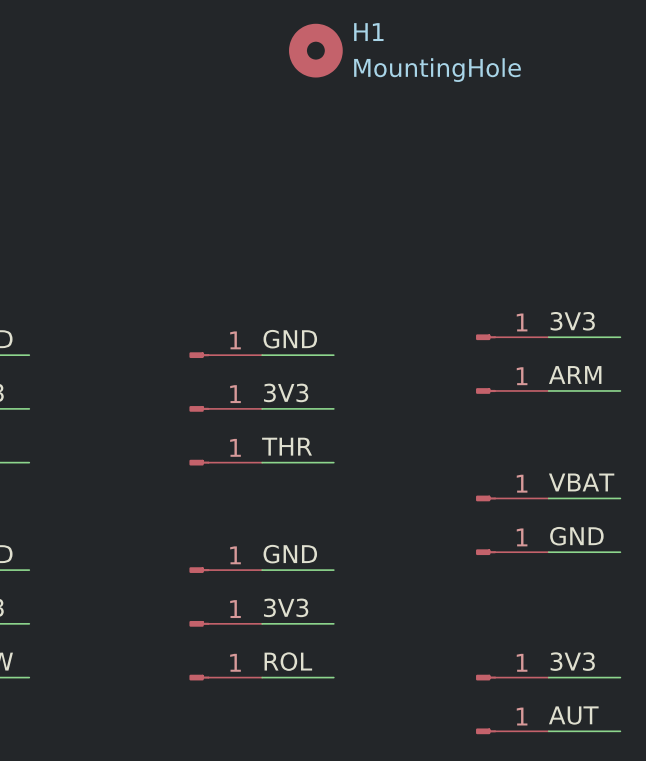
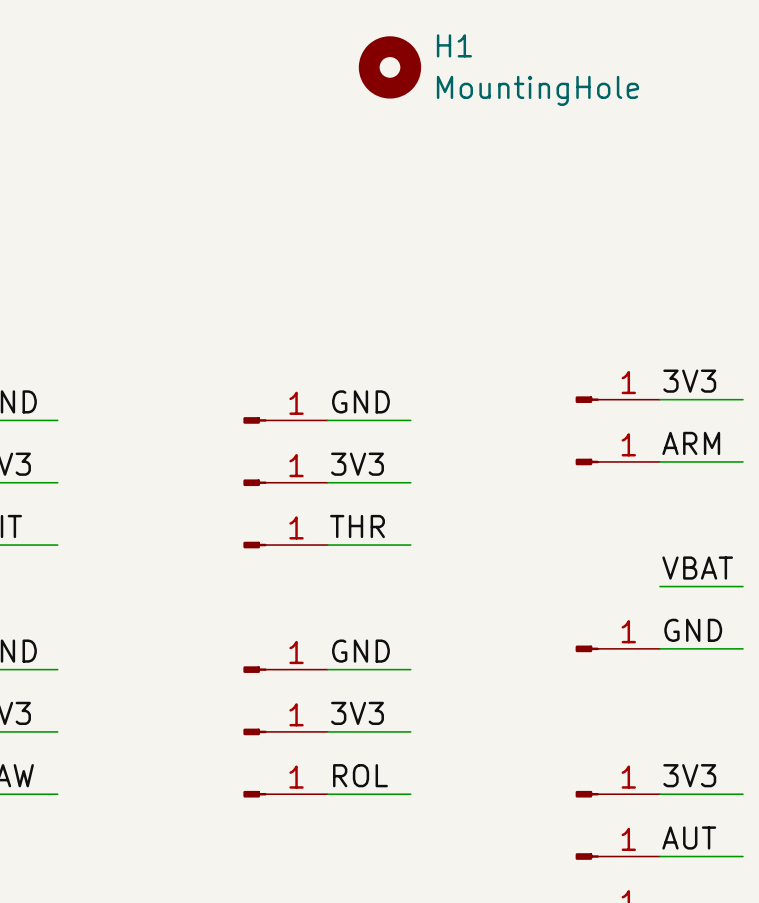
part: (512, 498) -> none

